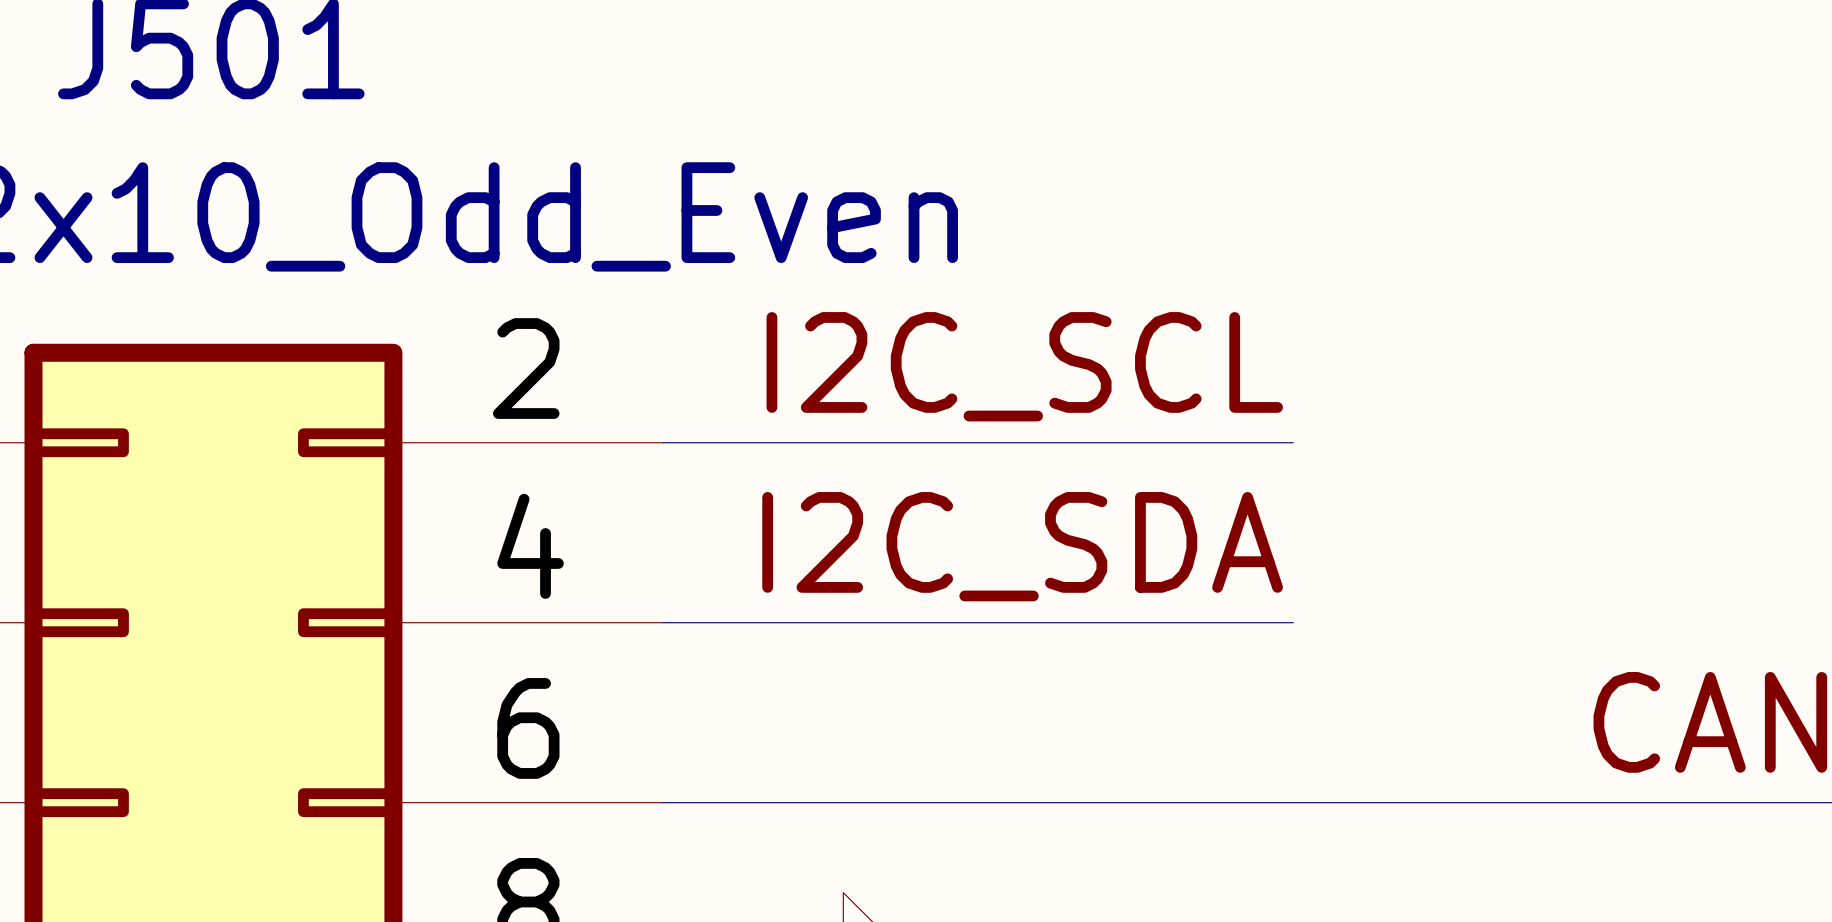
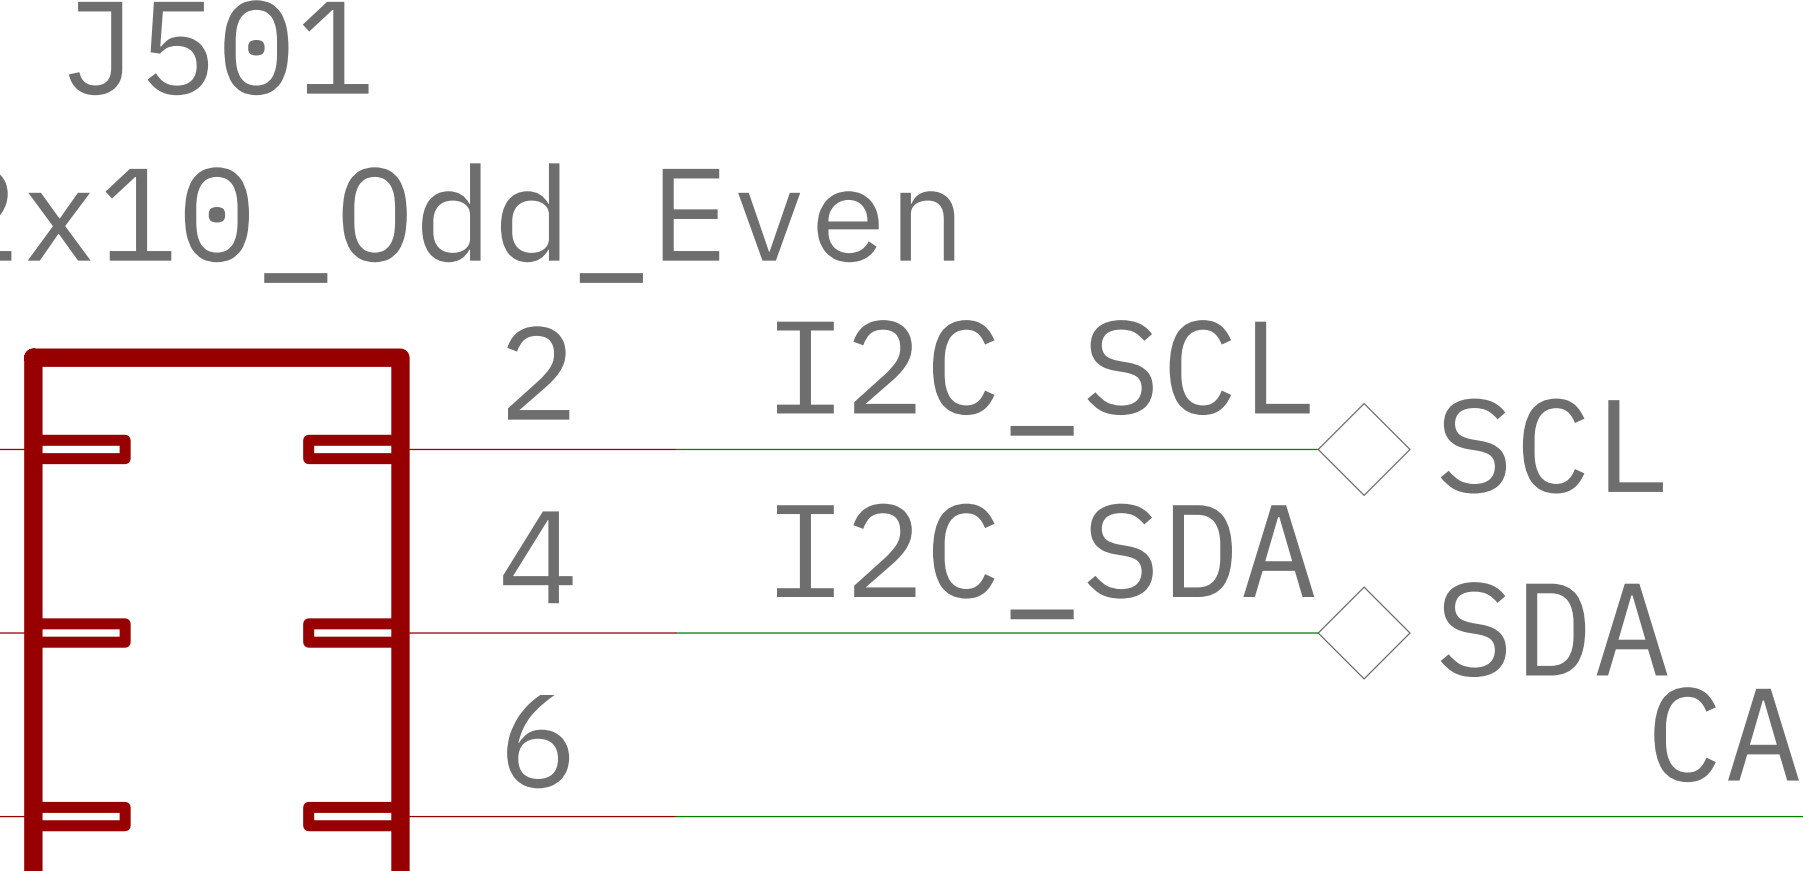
hierarchical label: none -> SCL (1551, 446)
hierarchical label: none -> SDA (1554, 629)

